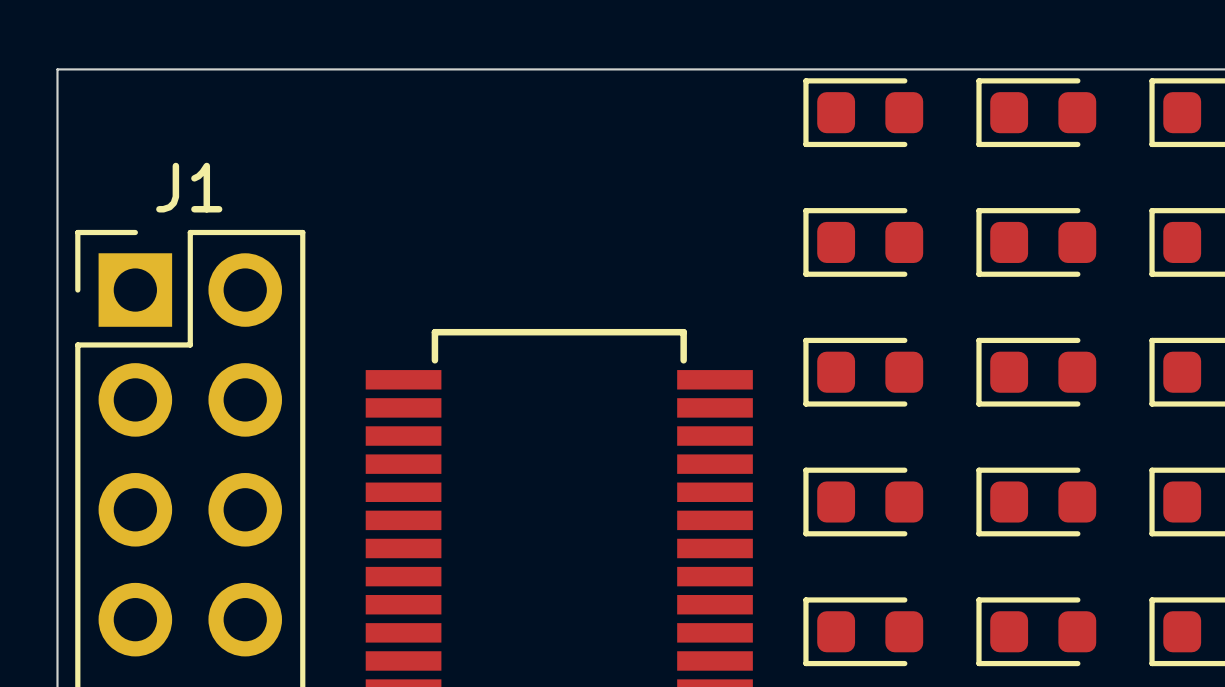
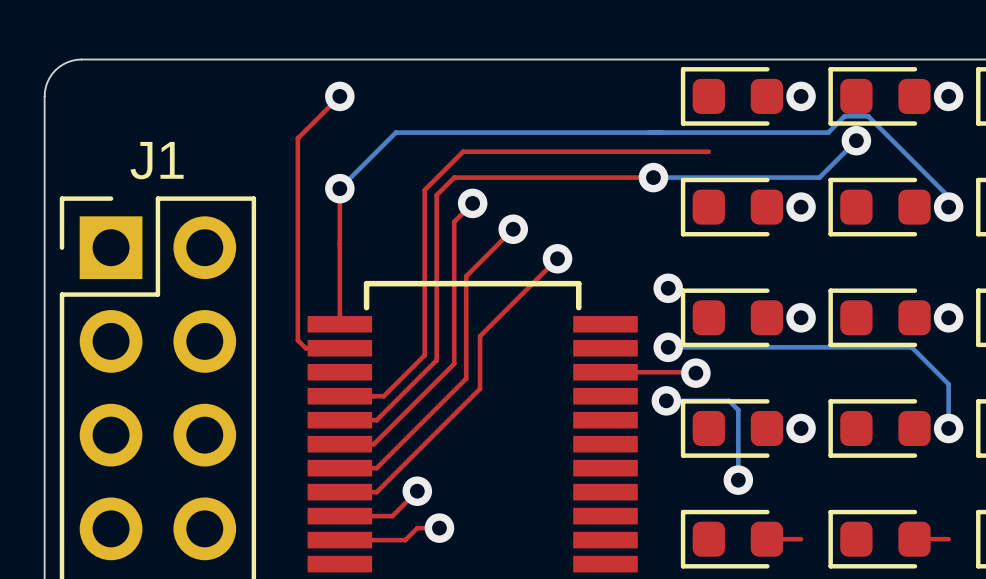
board edge: (100, 69) (57, 69) (57, 112) -> (81, 59) (67, 62) (55, 70) (47, 82) (44, 96)
top track: none -> (339, 96) (297, 138) (297, 340) (305, 348) (339, 348)
via: none -> (339, 96)
via: none -> (801, 96)
via: none -> (948, 96)
bottom track: none -> (856, 140) (819, 177) (653, 177)
via: none -> (856, 140)
top track: none -> (708, 151) (463, 151) (424, 190) (424, 355) (383, 396) (339, 396)
top track: none -> (653, 177) (454, 177) (436, 195) (436, 360) (376, 420) (339, 420)
via: none -> (653, 177)
top track: none -> (339, 188) (339, 324)
bottom track: none -> (339, 188) (395, 132) (828, 132) (844, 116) (868, 116) (948, 196) (948, 207)
via: none -> (339, 188)
top track: none -> (472, 203) (454, 221) (454, 363) (373, 444) (339, 444)
via: none -> (472, 203)
via: none -> (801, 207)
via: none -> (948, 207)
top track: none -> (513, 229) (466, 276) (466, 378) (376, 468) (339, 468)
via: none -> (513, 229)
top track: none -> (557, 258) (480, 336) (480, 388) (376, 492) (339, 492)
via: none -> (557, 258)
via: none -> (668, 288)
via: none -> (801, 317)
via: none -> (948, 317)
bottom track: none -> (668, 347) (911, 347) (948, 384) (948, 428)
via: none -> (668, 347)
top track: none -> (605, 372) (695, 373)
via: none -> (695, 373)
bottom track: none -> (666, 400) (729, 400) (738, 410) (738, 480)
via: none -> (666, 400)
via: none -> (801, 428)
via: none -> (948, 428)
via: none -> (738, 480)
top track: none -> (417, 491) (392, 516) (339, 516)
via: none -> (417, 491)
top track: none -> (439, 528) (417, 528) (405, 540) (339, 540)
via: none -> (439, 528)
top track: none -> (766, 539) (801, 539)
top track: none -> (914, 539) (948, 539)

